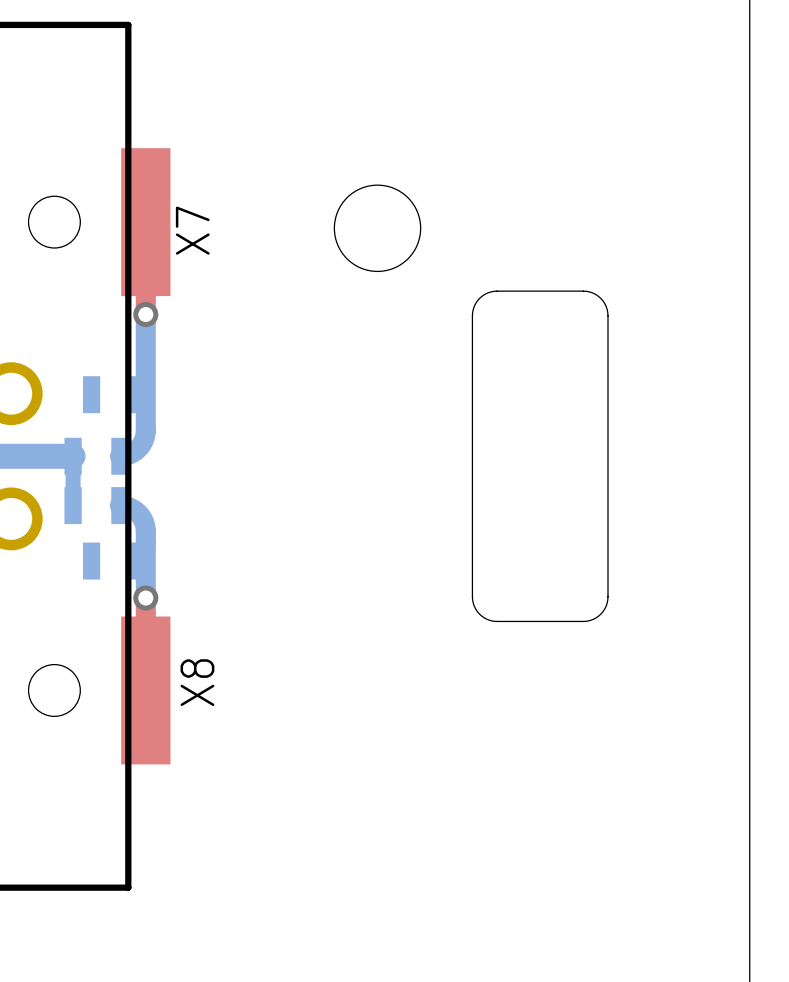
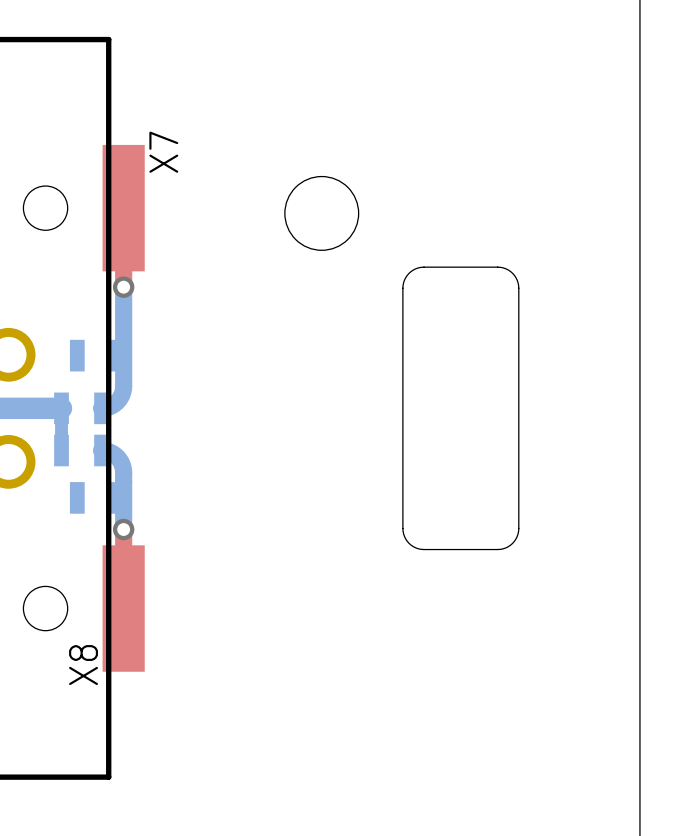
X7 name position: X7 (192, 230) -> X7 (163, 152)
X8 name position: X8 (197, 682) -> X8 (83, 665)

